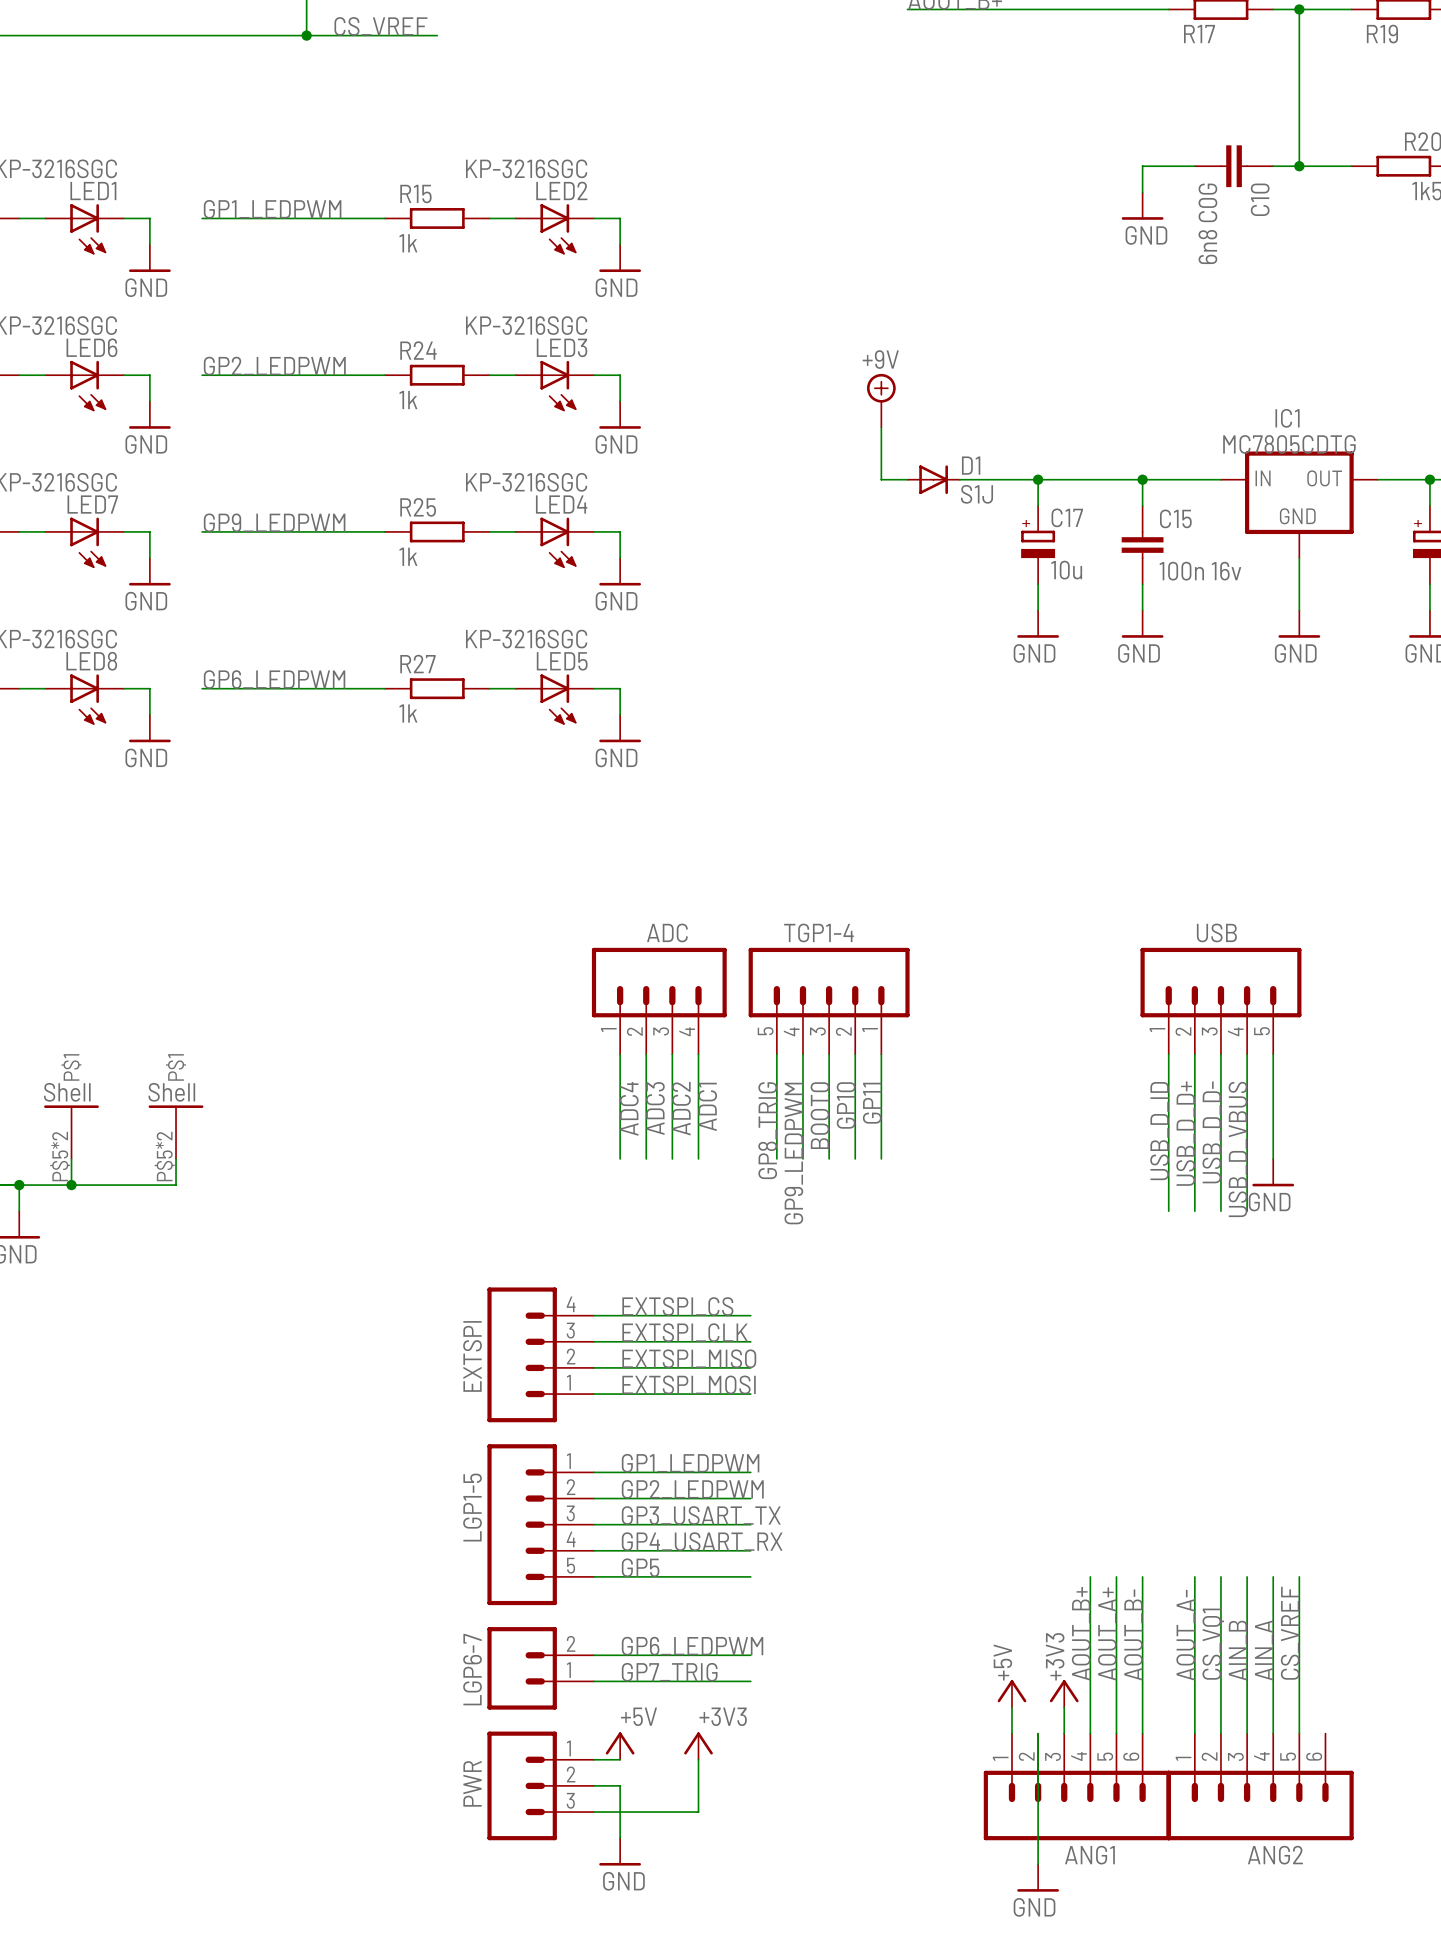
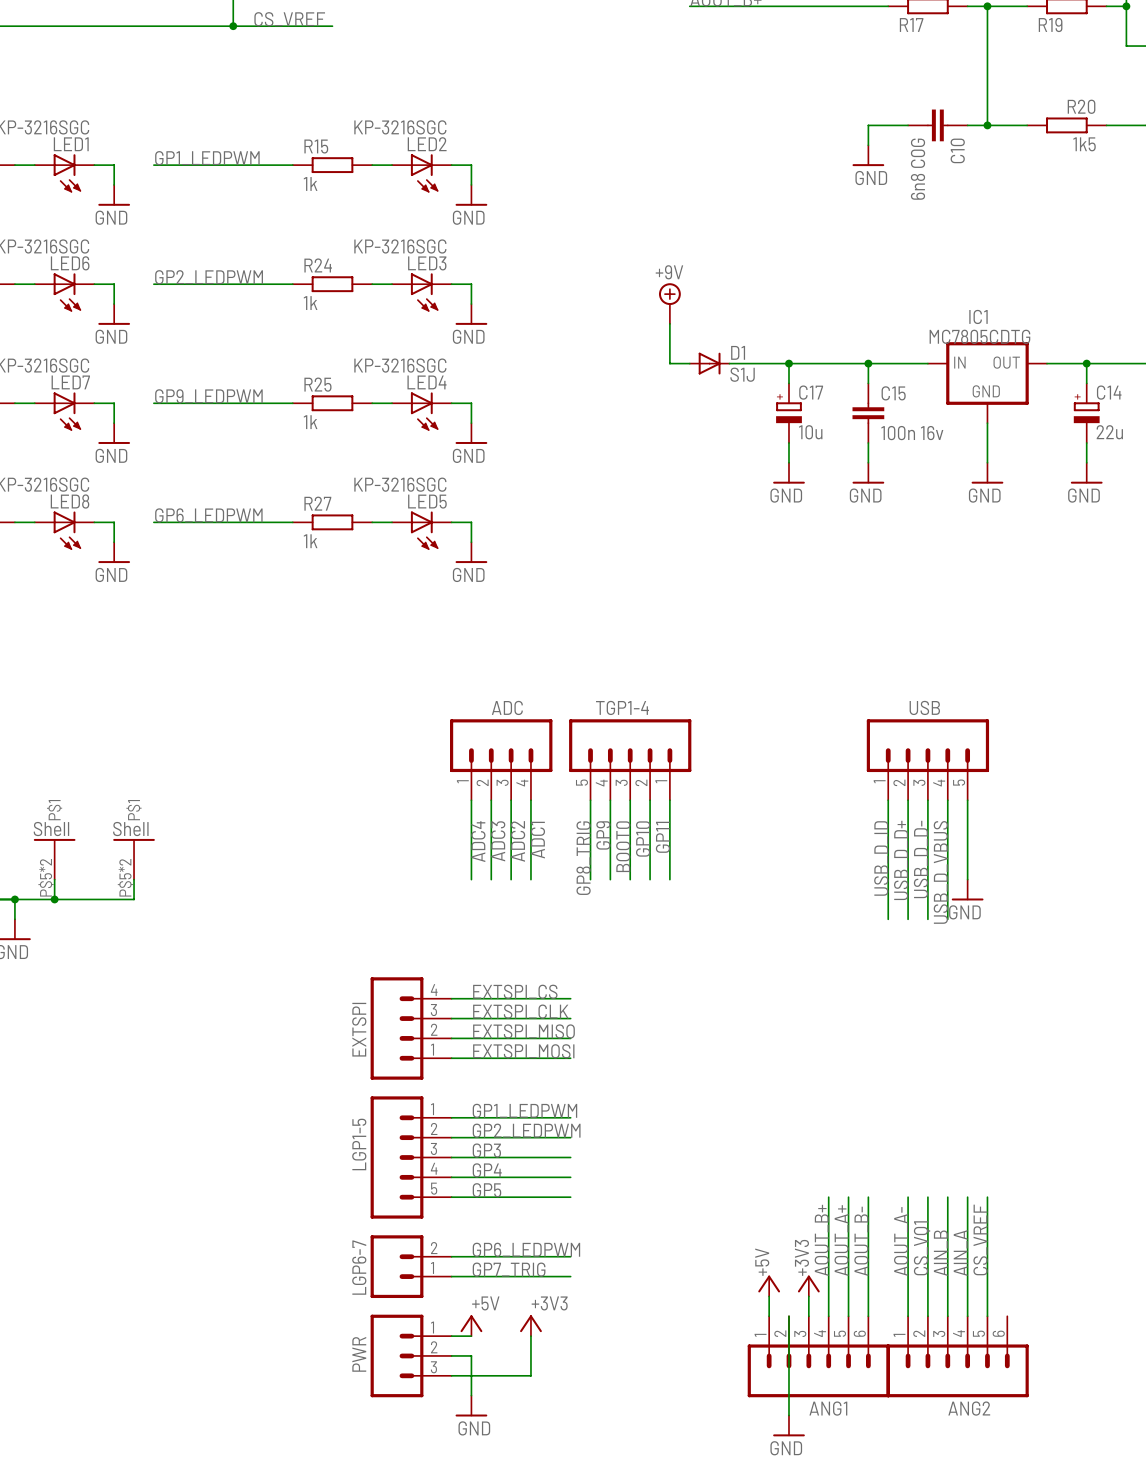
label: GP9_LEDPWM (793, 1153) -> GP9 (603, 835)
label: GP3_USART_TX (701, 1515) -> GP3 (486, 1150)
label: GP4_USART_RX (702, 1541) -> GP4 (487, 1170)

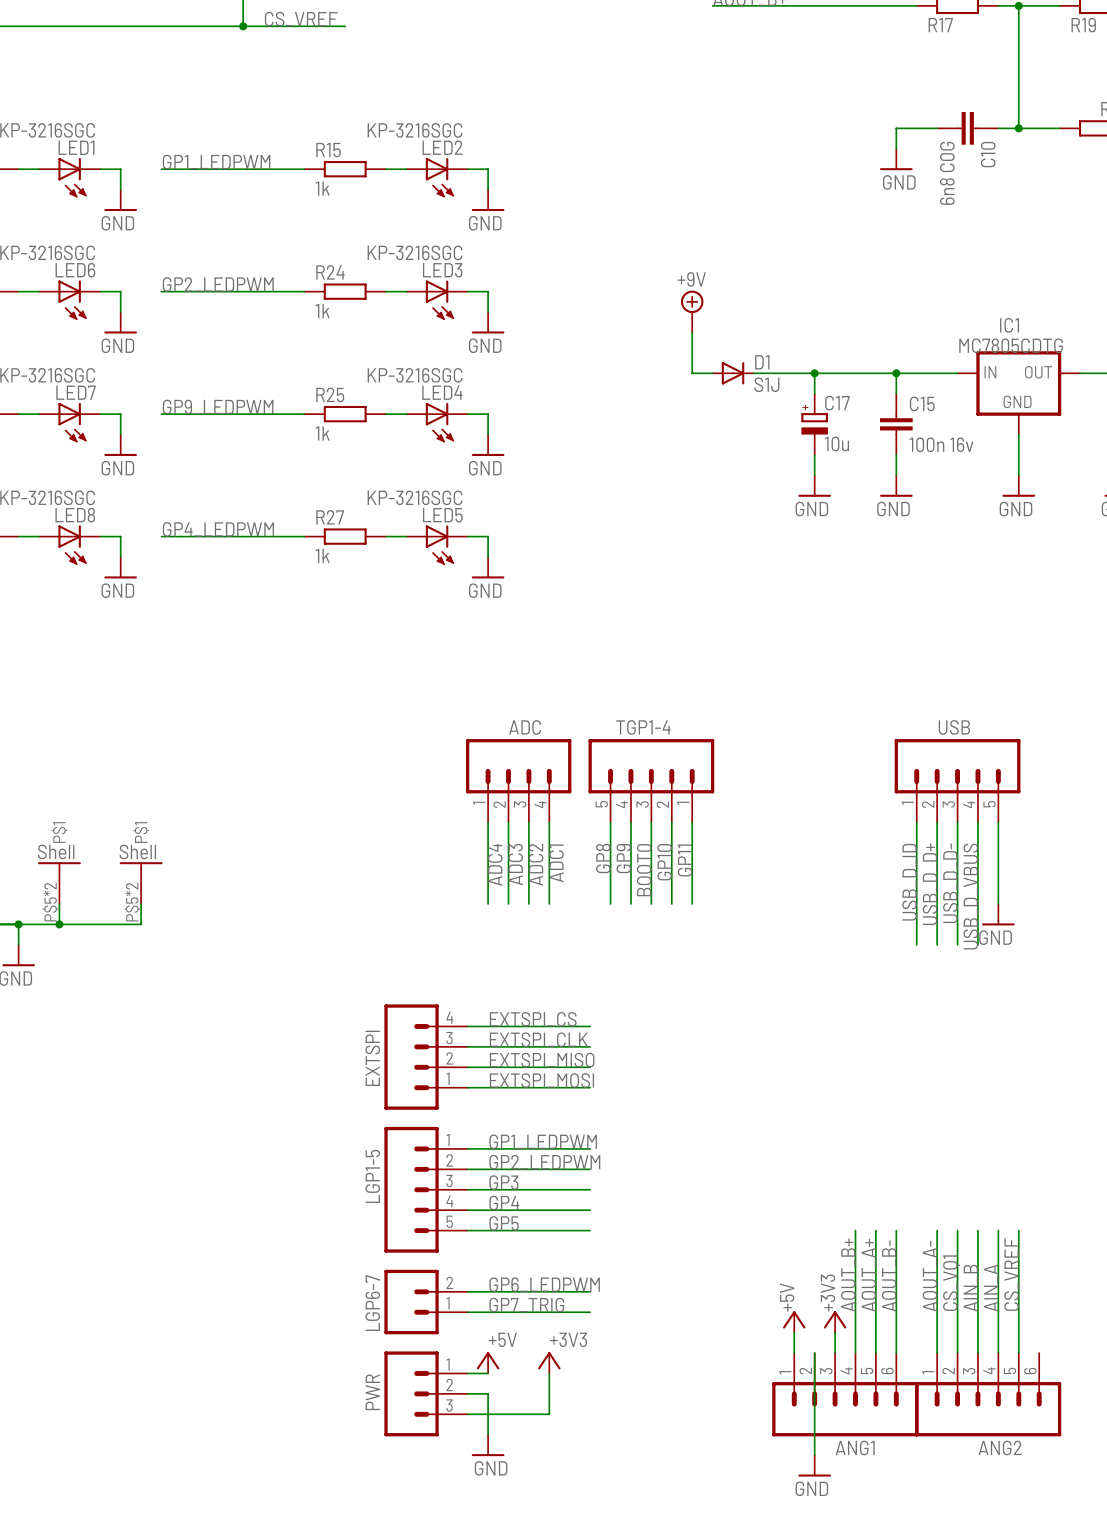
label: GP6_LEDPWM (208, 515) -> GP4_LEDPWM (218, 529)
label: GP8_TRIG (583, 858) -> GP8 (603, 858)

